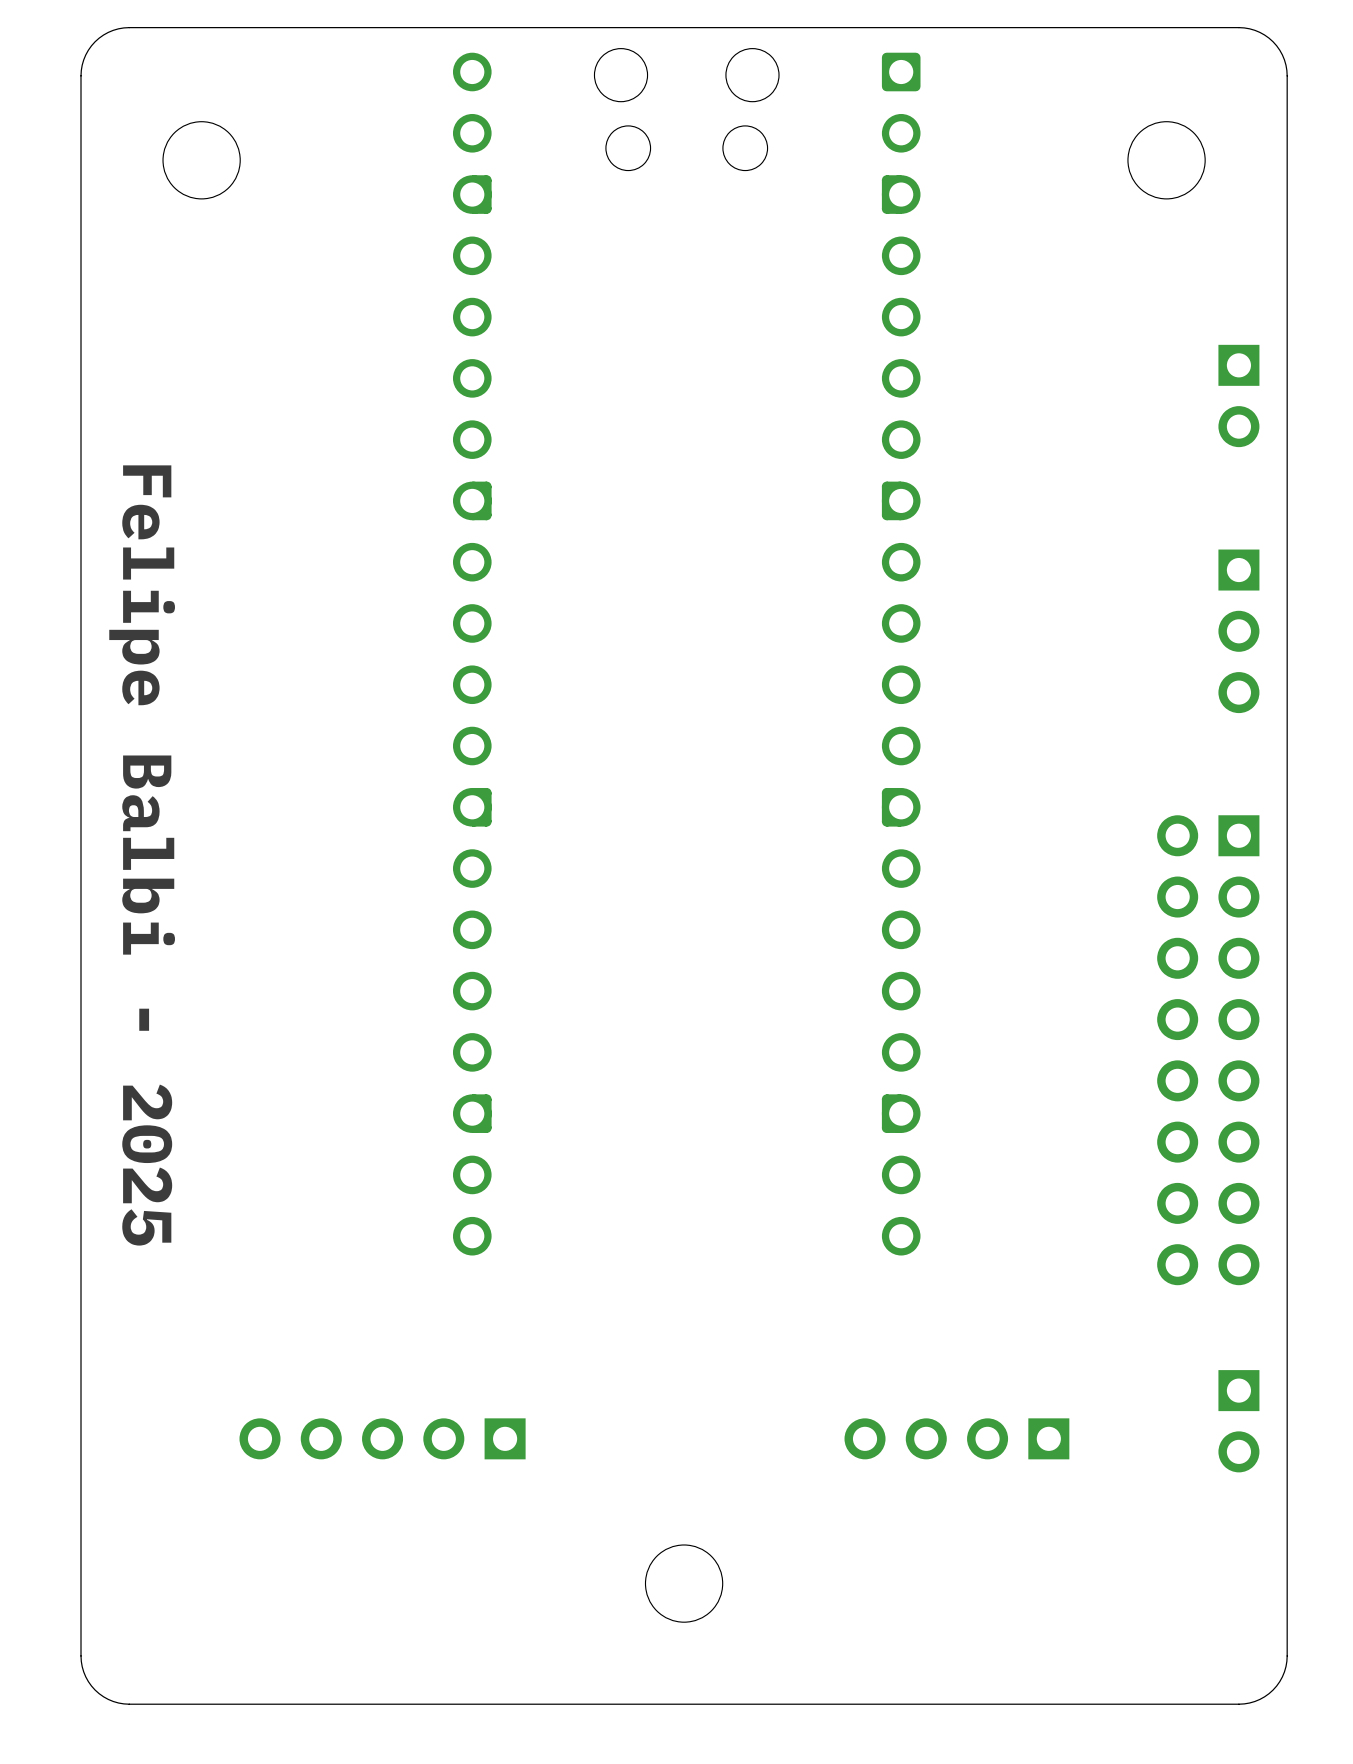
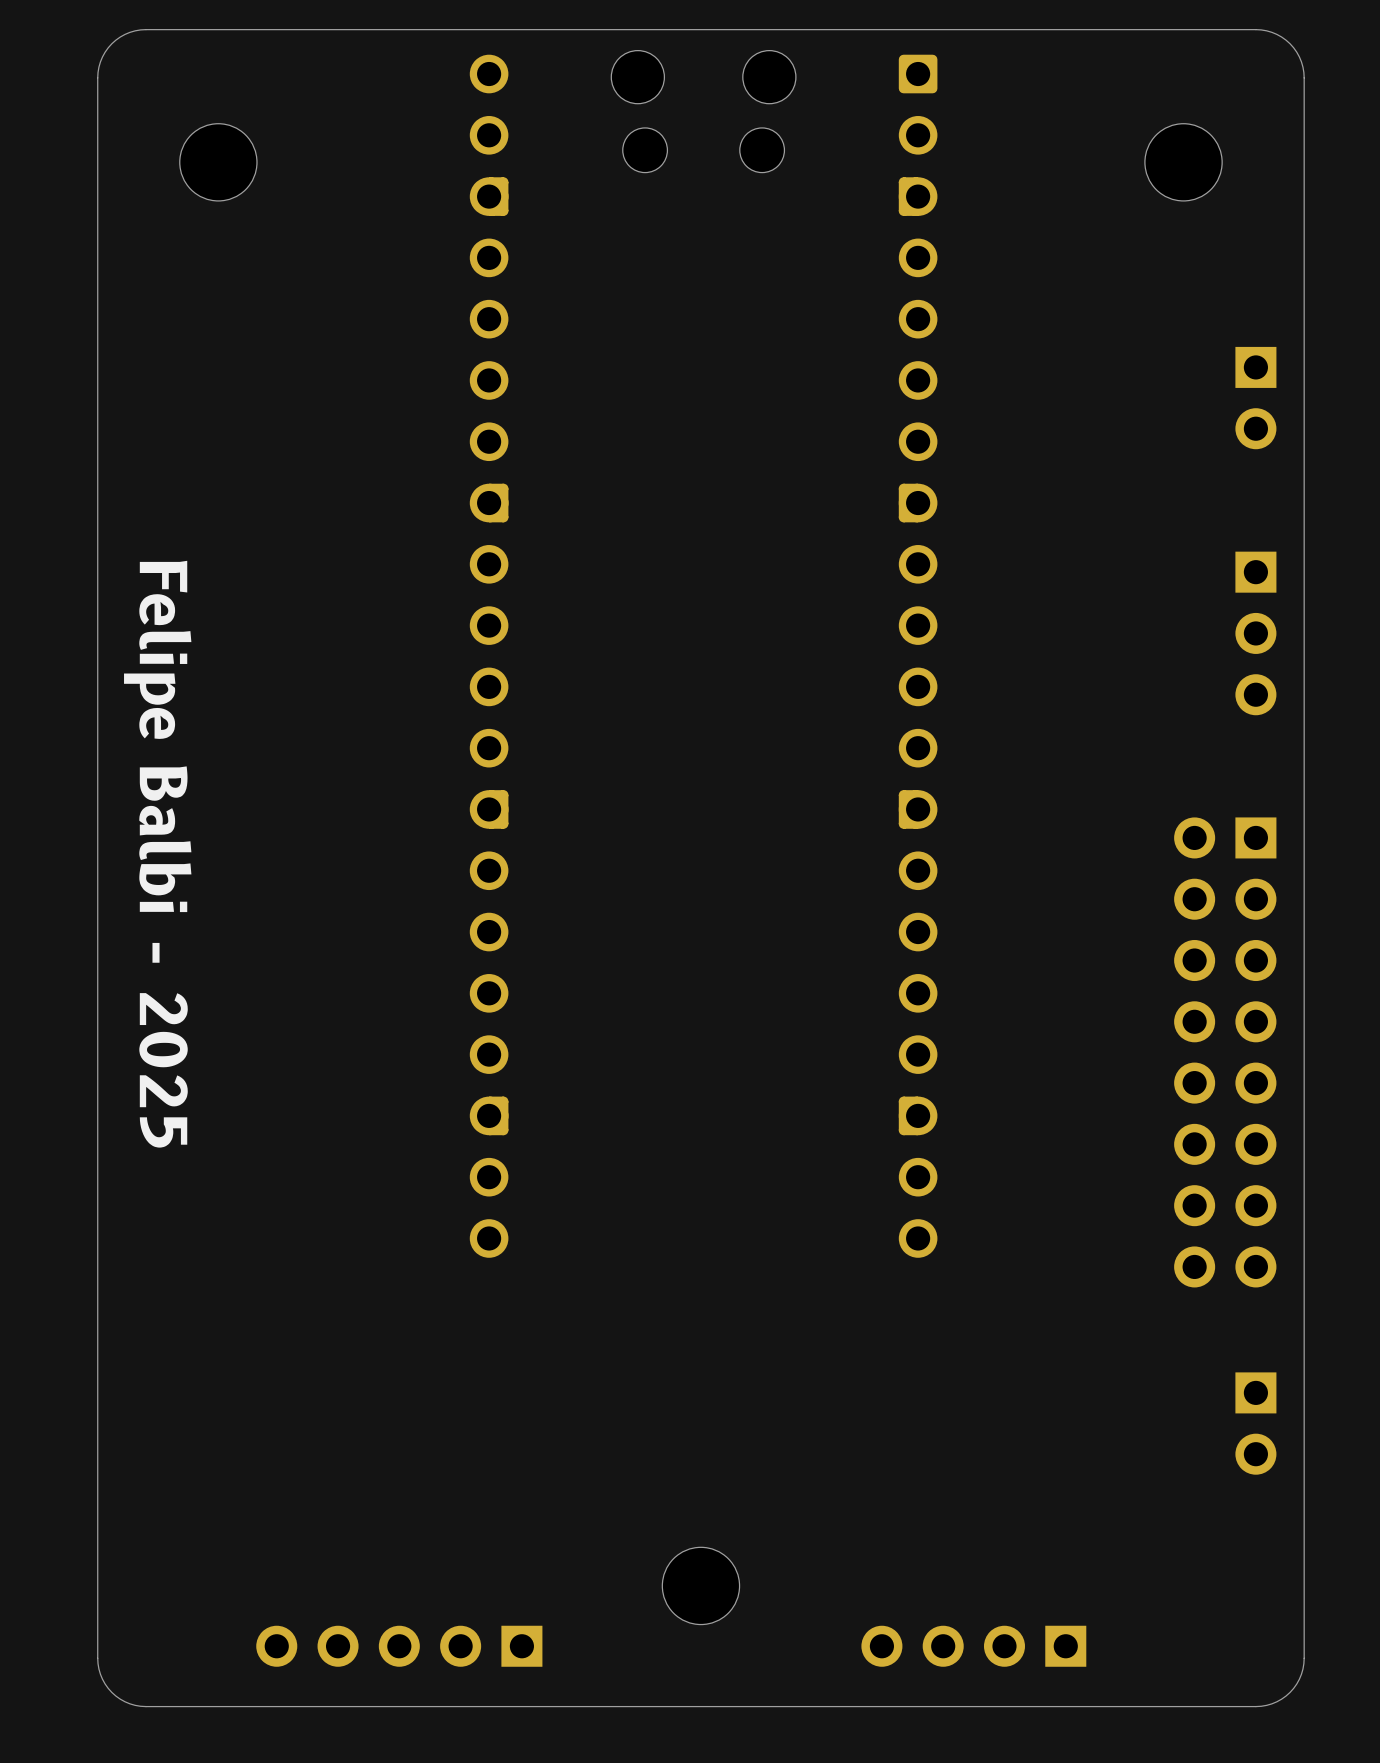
part position: (382, 1438) -> (399, 1646)
part position: (956, 1438) -> (973, 1646)

